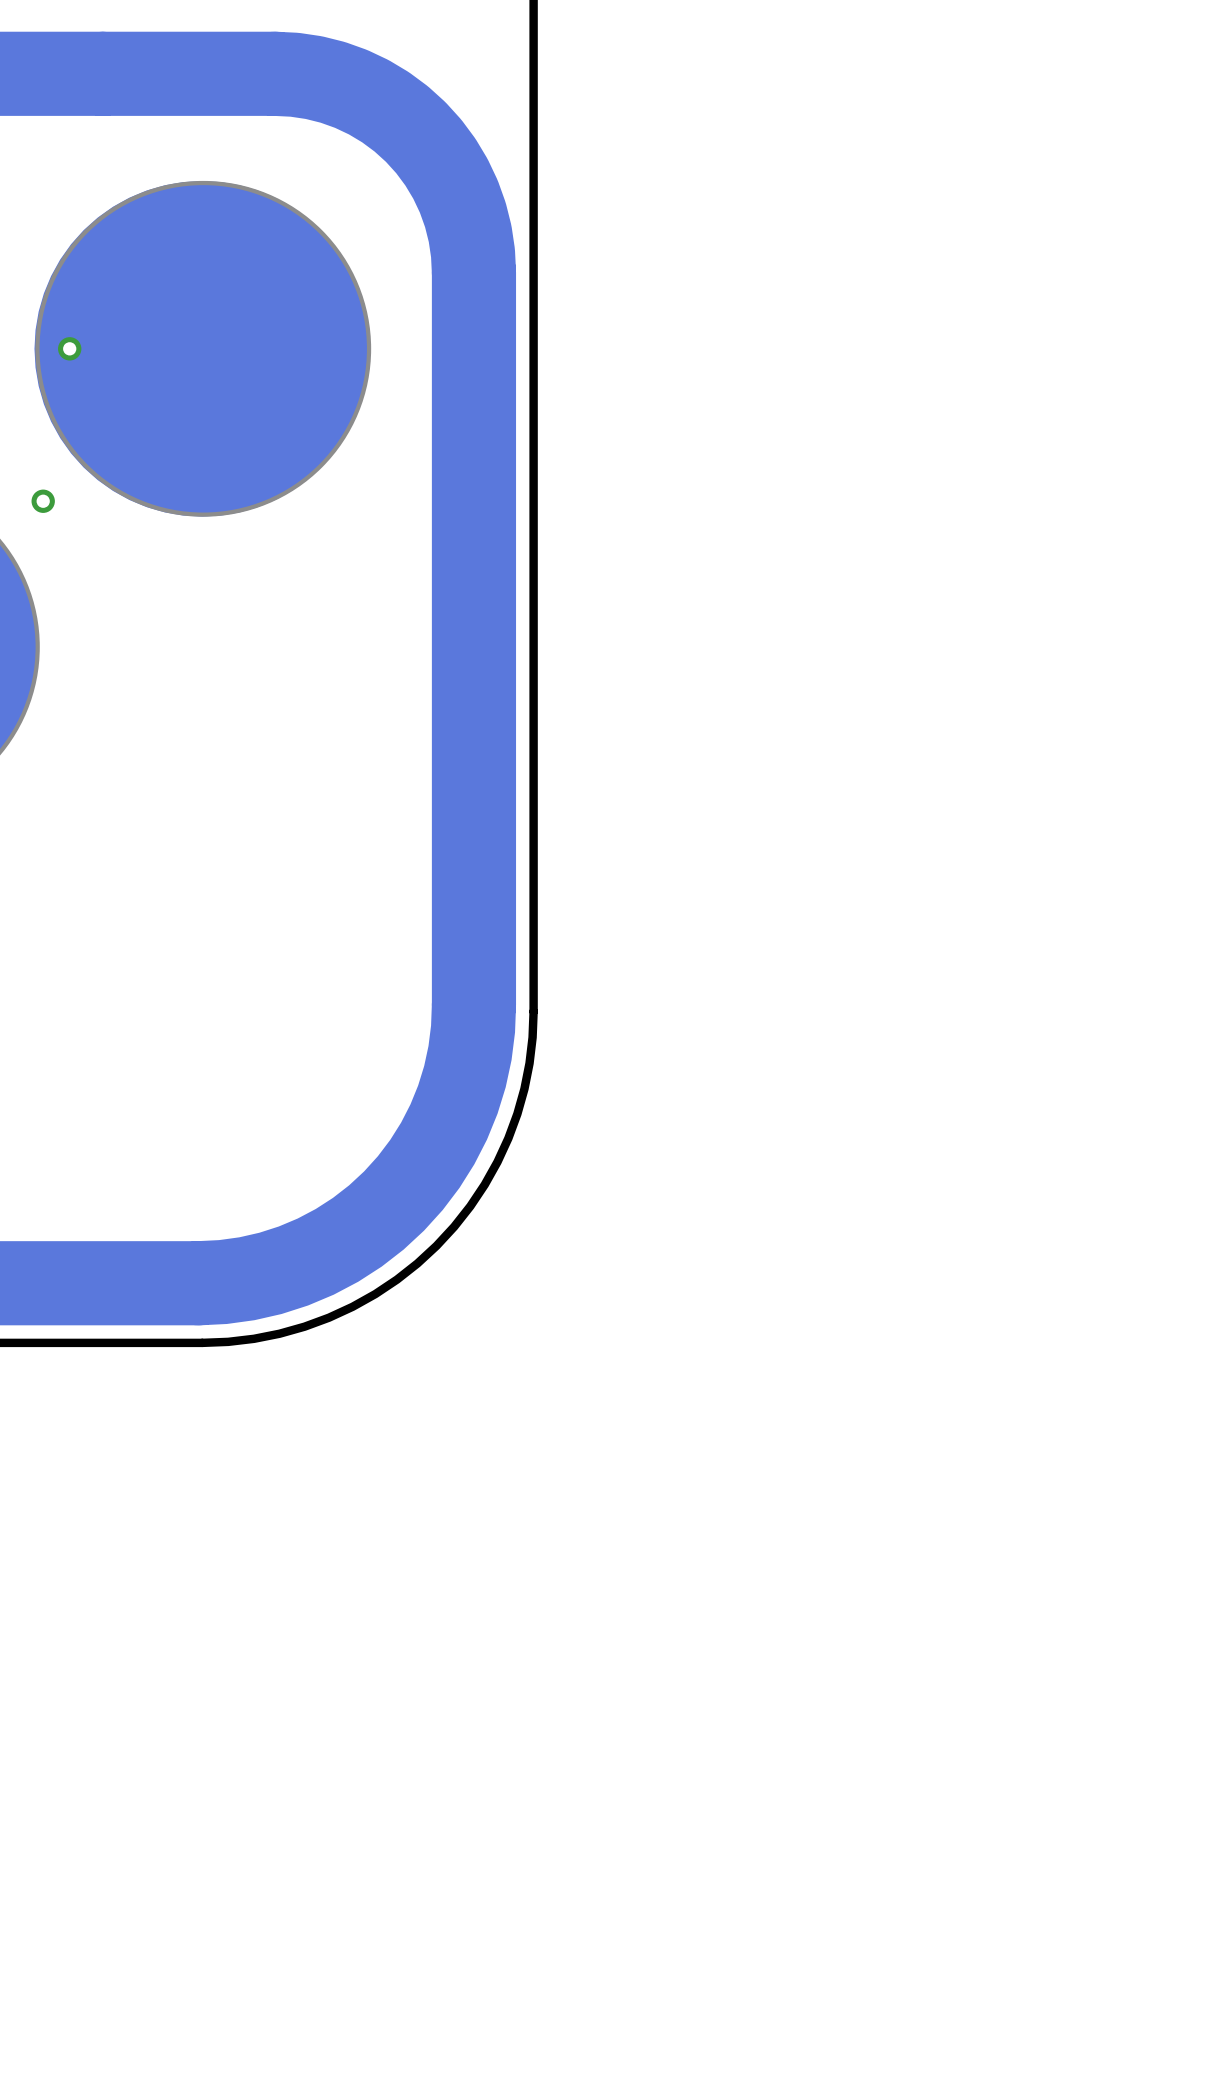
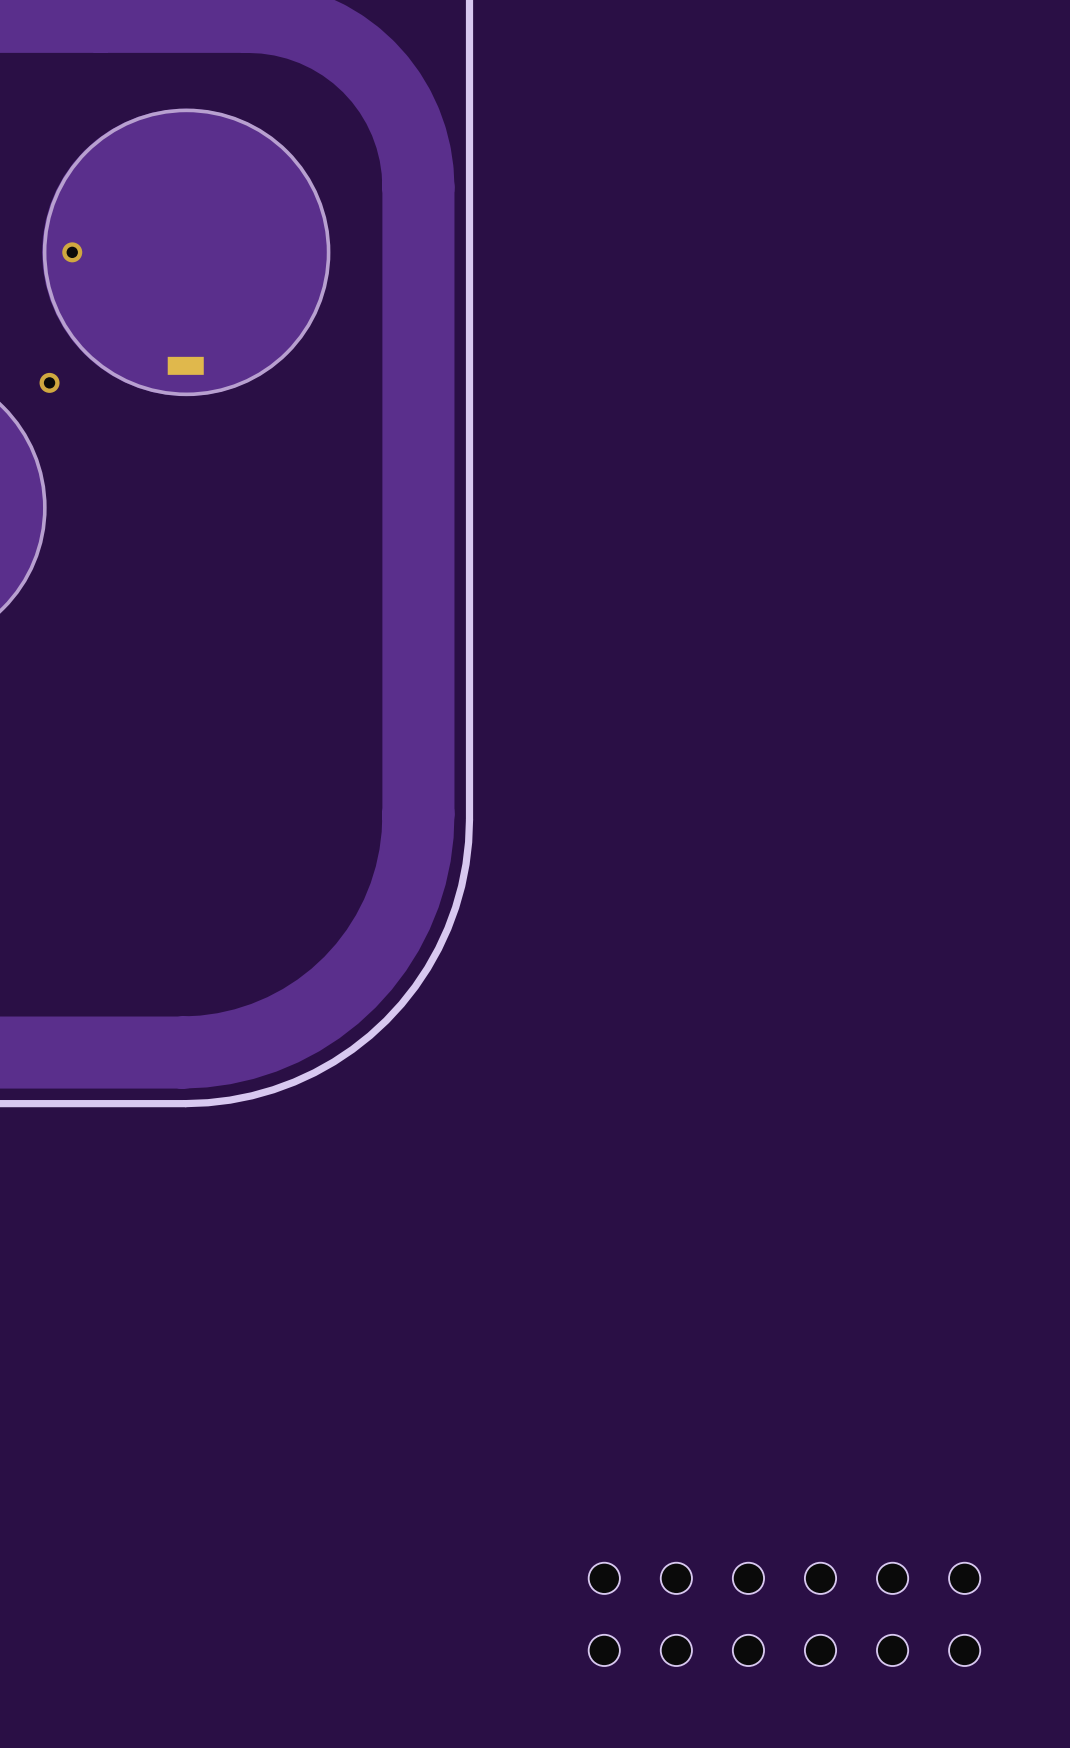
part: none -> (784, 1614)

